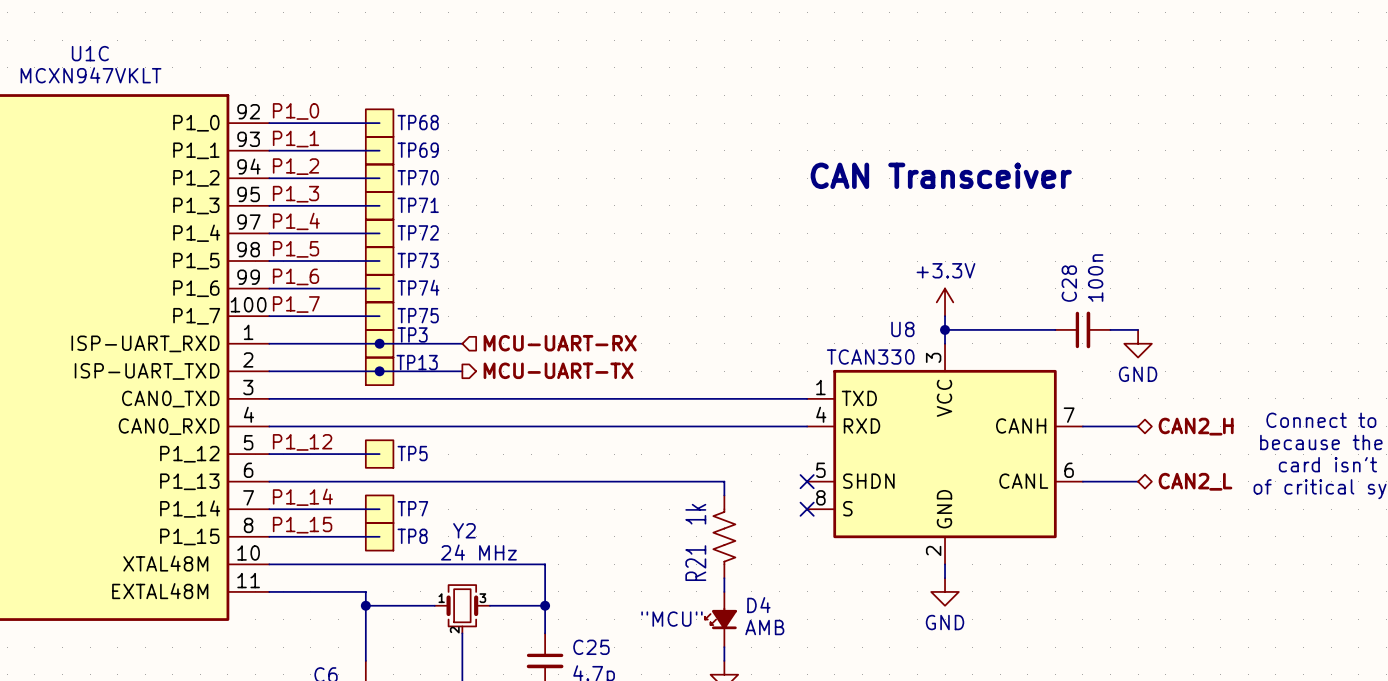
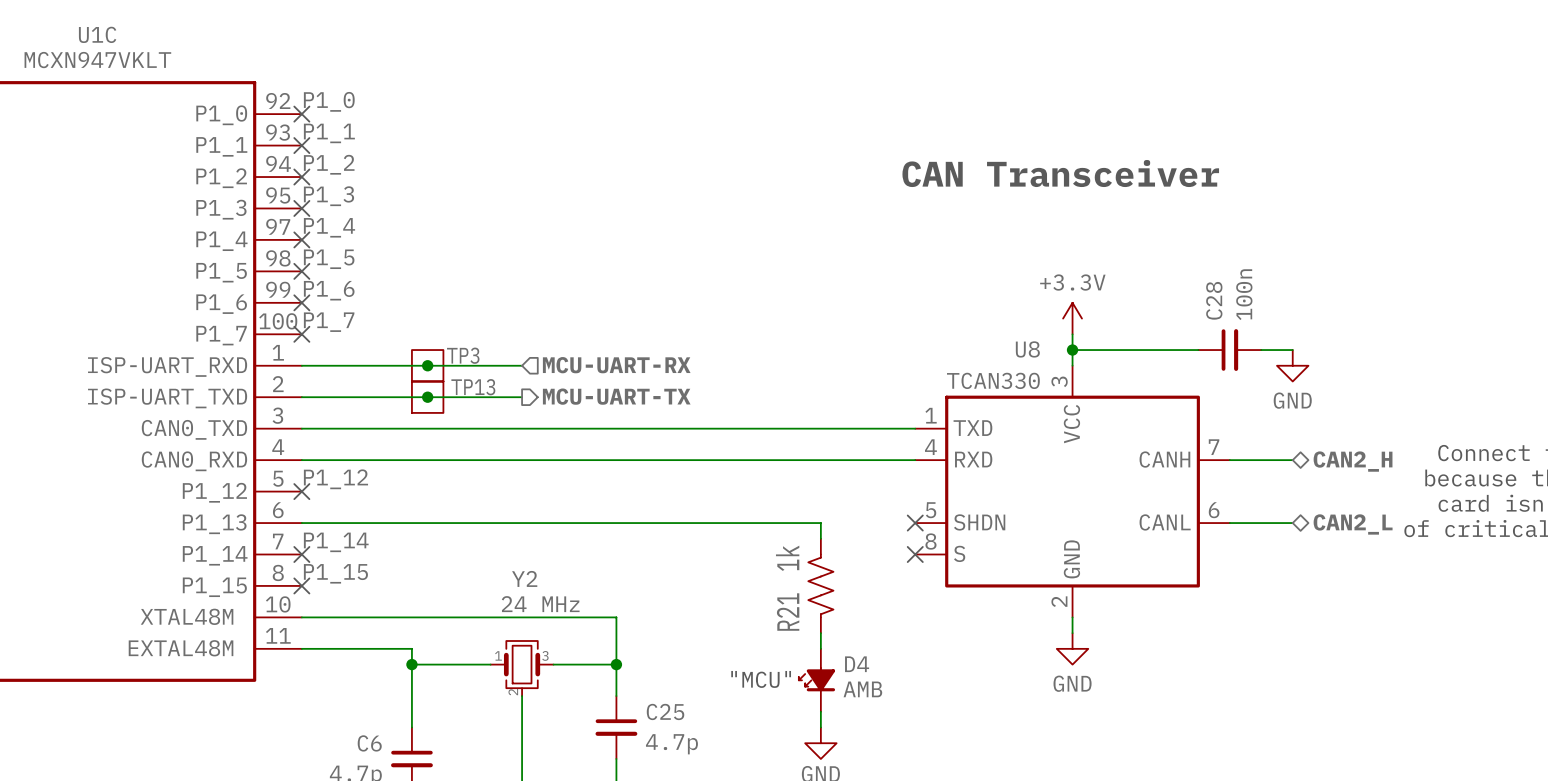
wire: (269, 123) (379, 123) -> none
no-connect mark: none -> (301, 114)
TP68: (379, 123) -> none
wire: (269, 150) (379, 150) -> none
no-connect mark: none -> (301, 145)
TP69: (379, 150) -> none
wire: (269, 178) (379, 178) -> none
no-connect mark: none -> (301, 177)
TP70: (379, 178) -> none
wire: (269, 205) (379, 205) -> none
no-connect mark: none -> (301, 208)
TP71: (379, 205) -> none
wire: (269, 233) (379, 233) -> none
no-connect mark: none -> (301, 239)
TP72: (379, 233) -> none
wire: (269, 261) (379, 261) -> none
no-connect mark: none -> (301, 271)
TP73: (379, 261) -> none
wire: (269, 288) (379, 288) -> none
no-connect mark: none -> (301, 302)
TP74: (379, 288) -> none
wire: (269, 316) (379, 316) -> none
no-connect mark: none -> (301, 334)
TP75: (379, 316) -> none
wire: (269, 454) (379, 454) -> none
no-connect mark: none -> (301, 491)
TP5: (379, 454) -> none
wire: (269, 509) (379, 509) -> none
no-connect mark: none -> (301, 554)
TP7: (379, 509) -> none
wire: (269, 536) (379, 536) -> none
no-connect mark: none -> (301, 585)
TP8: (379, 536) -> none

